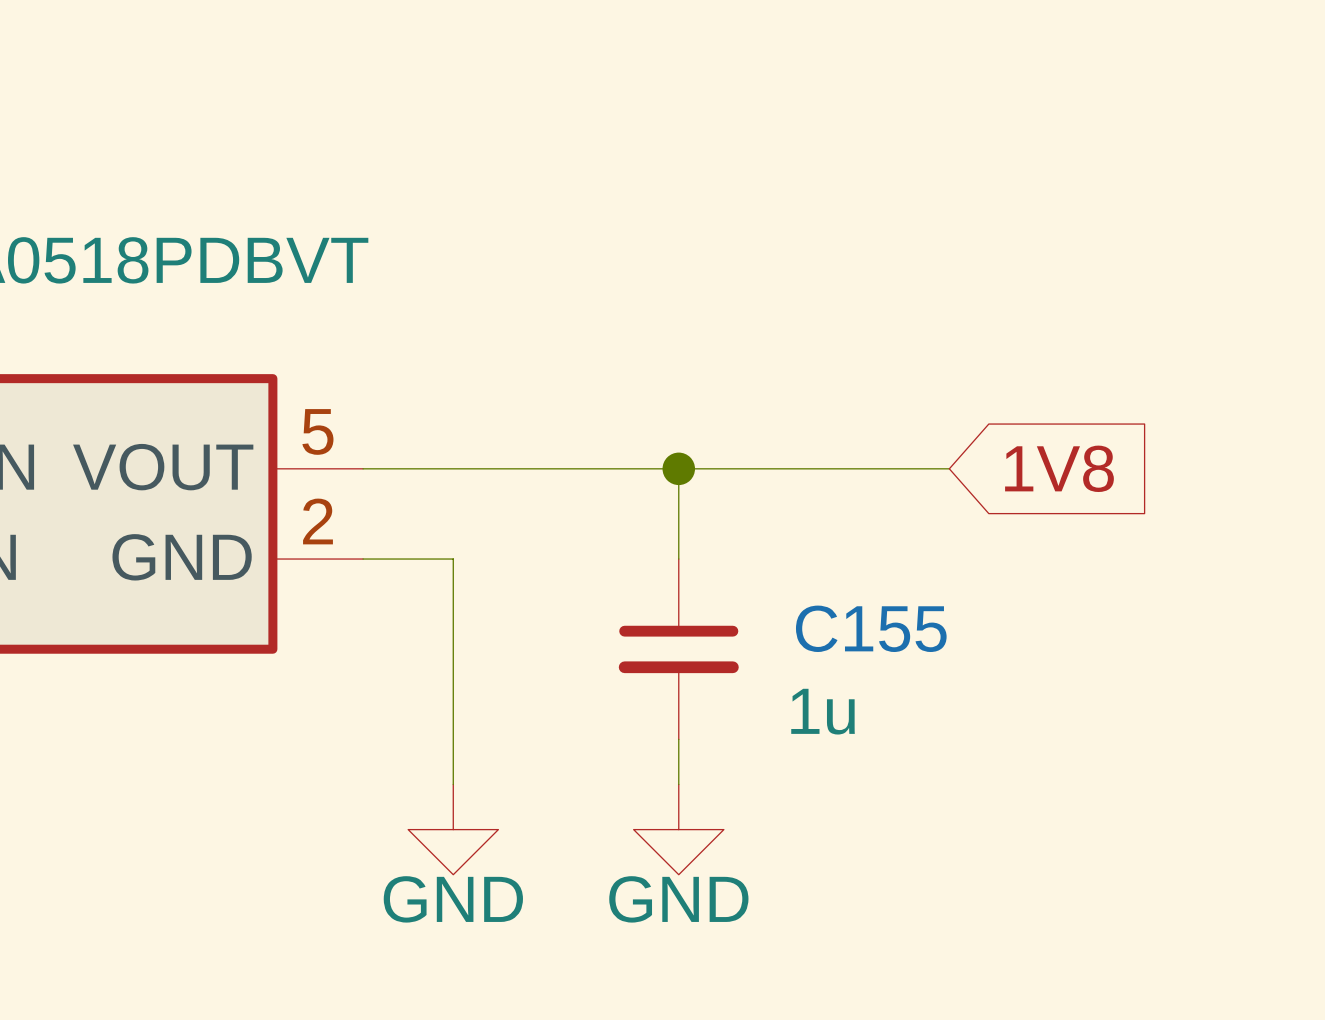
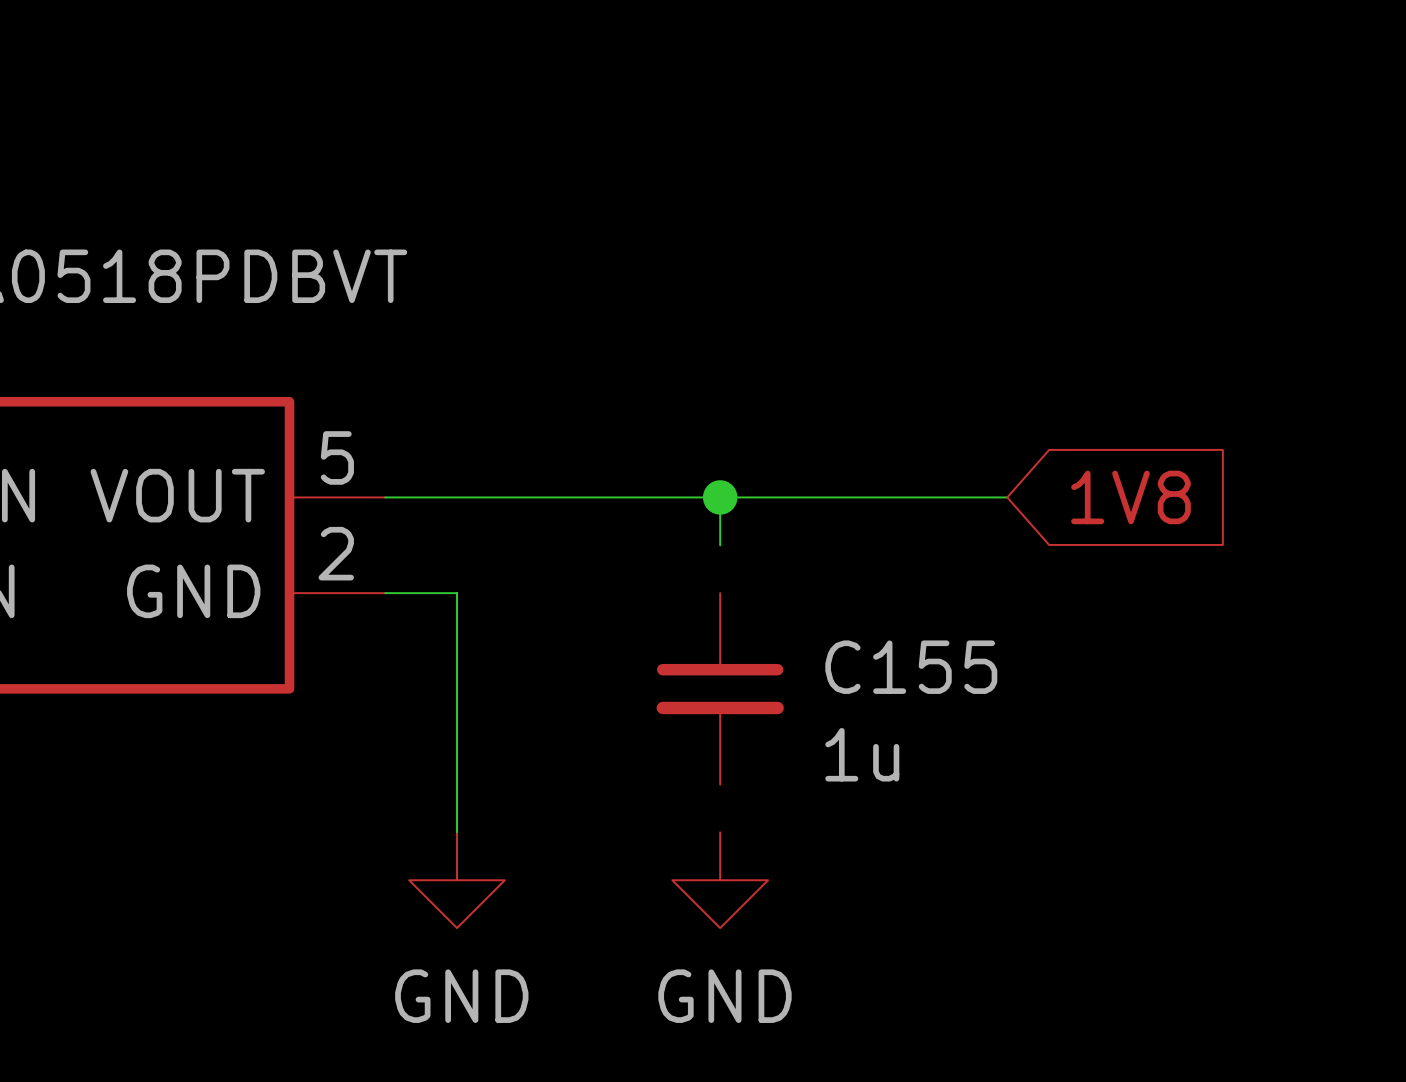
wire: (678, 513) (678, 559) -> none
wire: (430, 559) (453, 559) (453, 784) -> (457, 593) (457, 832)
wire: (678, 739) (678, 784) -> none
power symbol position: GND (453, 829) -> GND (457, 880)
power symbol text position: GND (453, 899) -> GND (461, 996)
power symbol text position: GND (678, 899) -> GND (724, 996)

